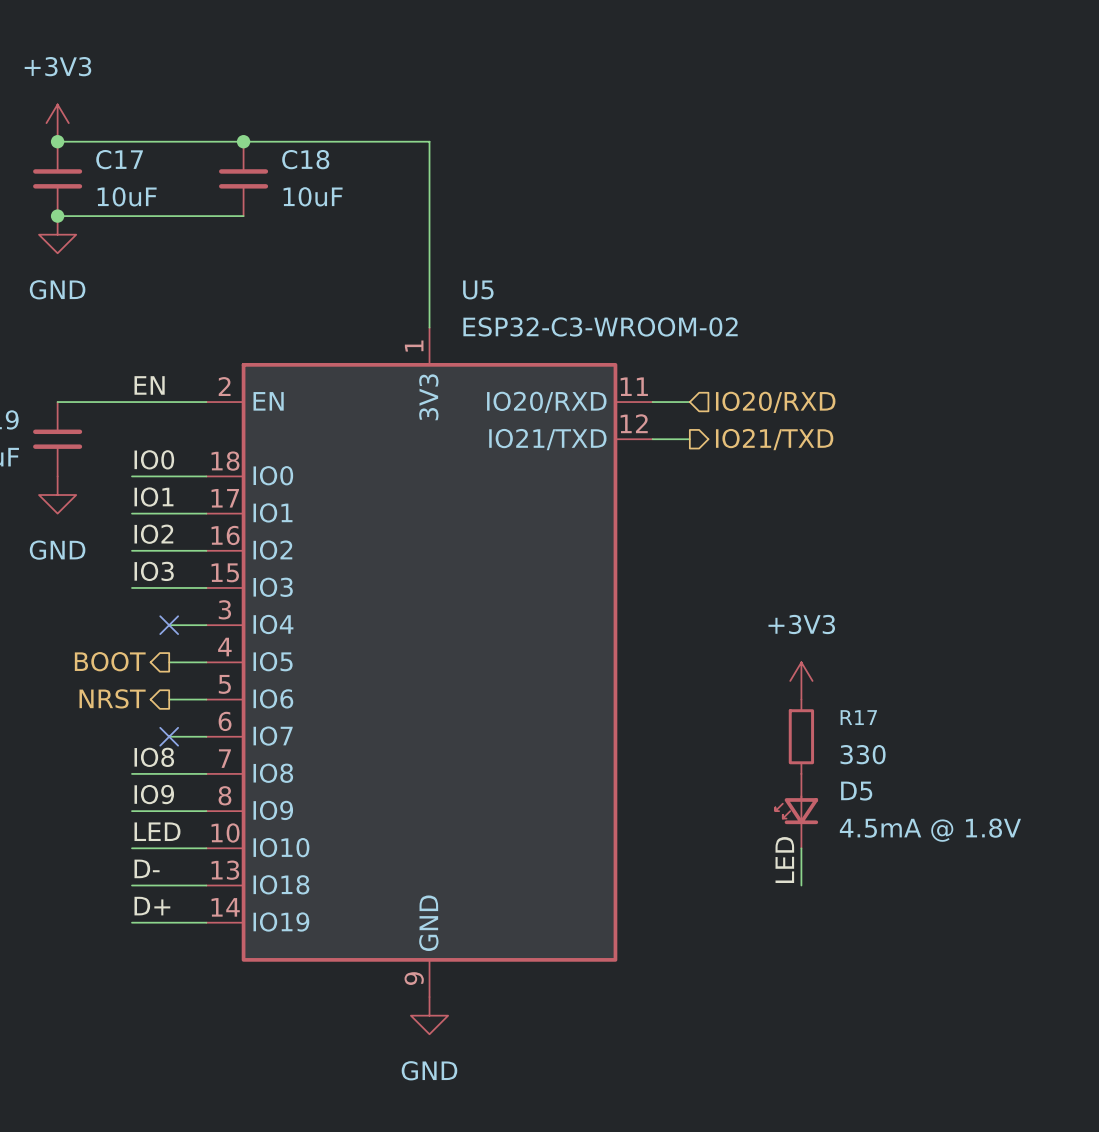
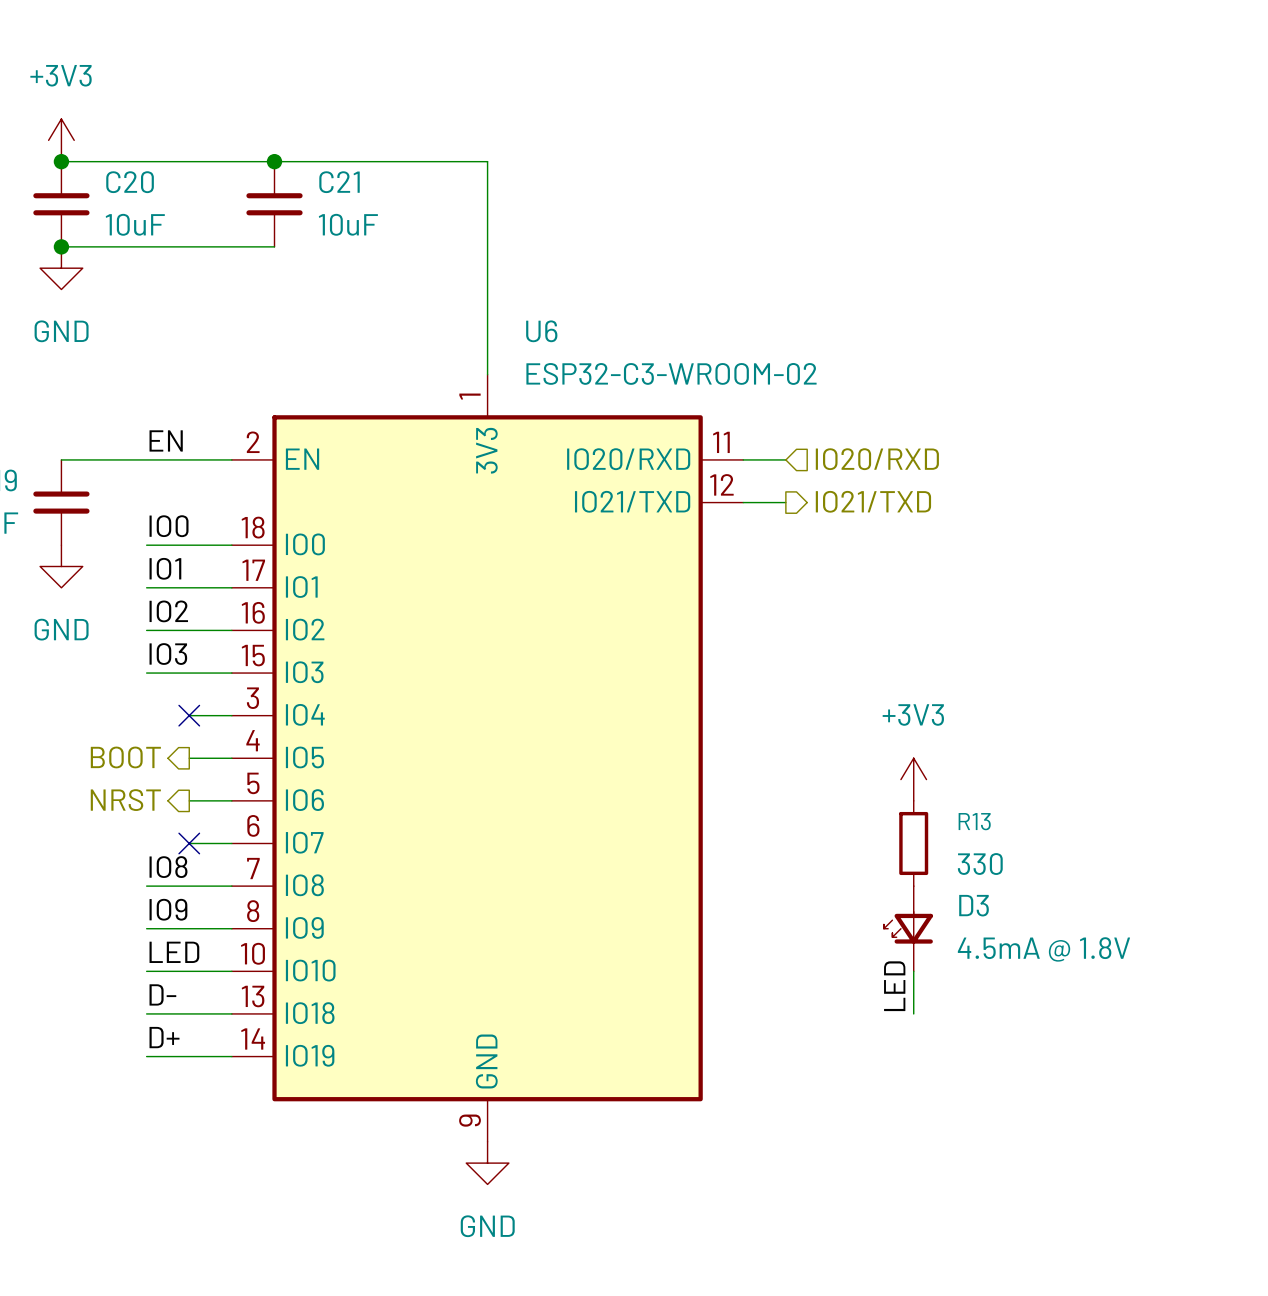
C17 name: C17 (119, 159) -> C20 (130, 182)
C18 name: C18 (305, 159) -> C21 (339, 182)
U5 name: U5 (478, 289) -> U6 (541, 331)
R17 name: R17 (858, 717) -> R13 (974, 821)
D5 name: D5 (856, 791) -> D3 (974, 905)

